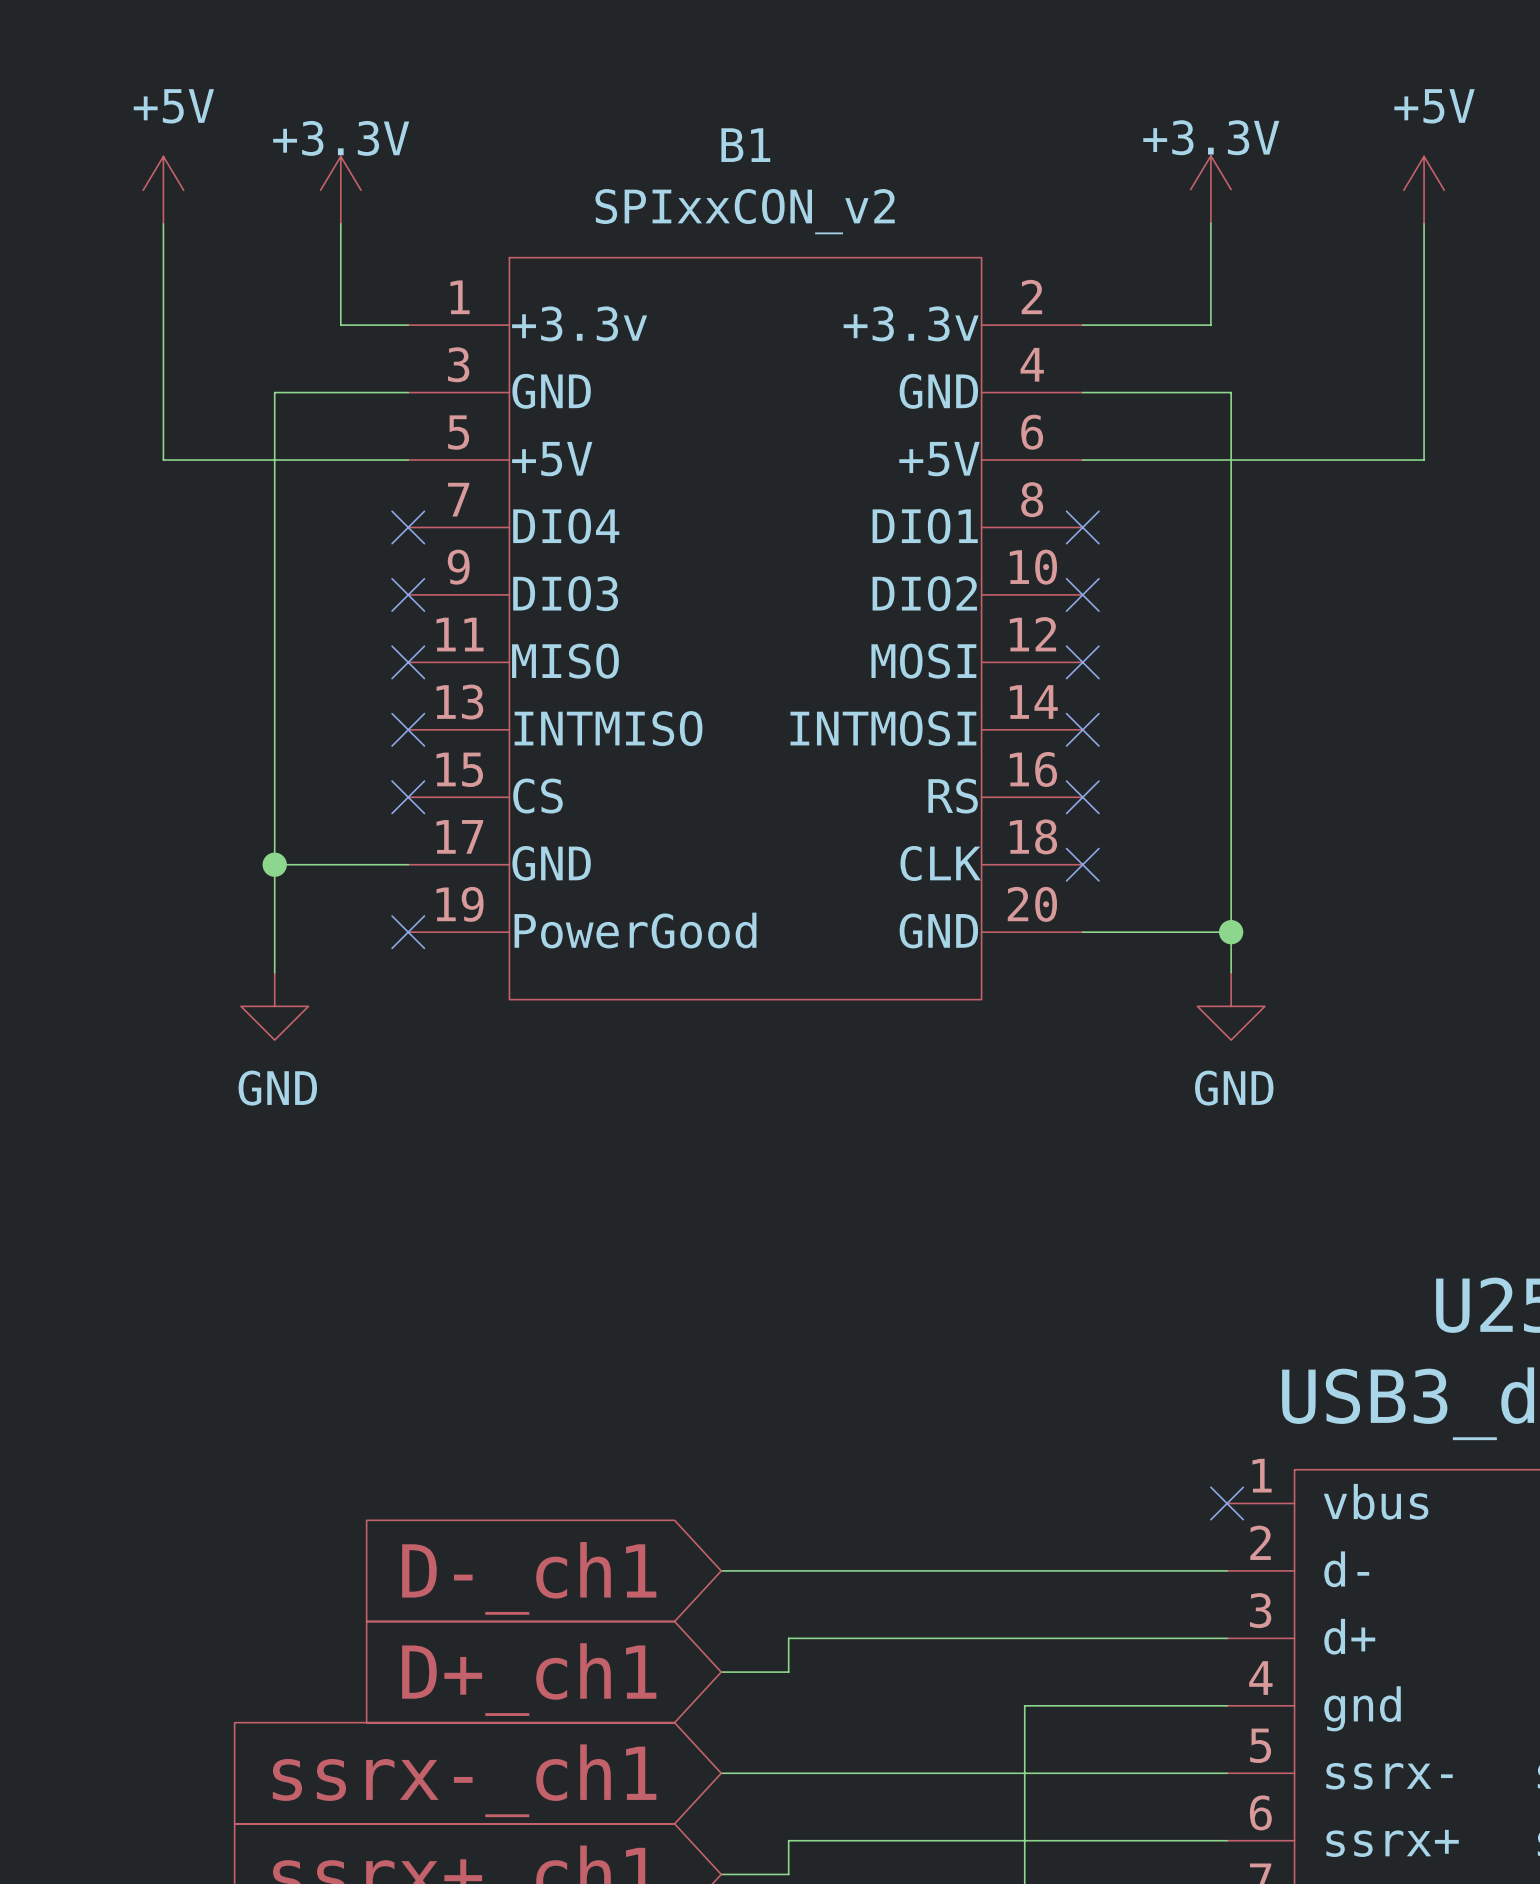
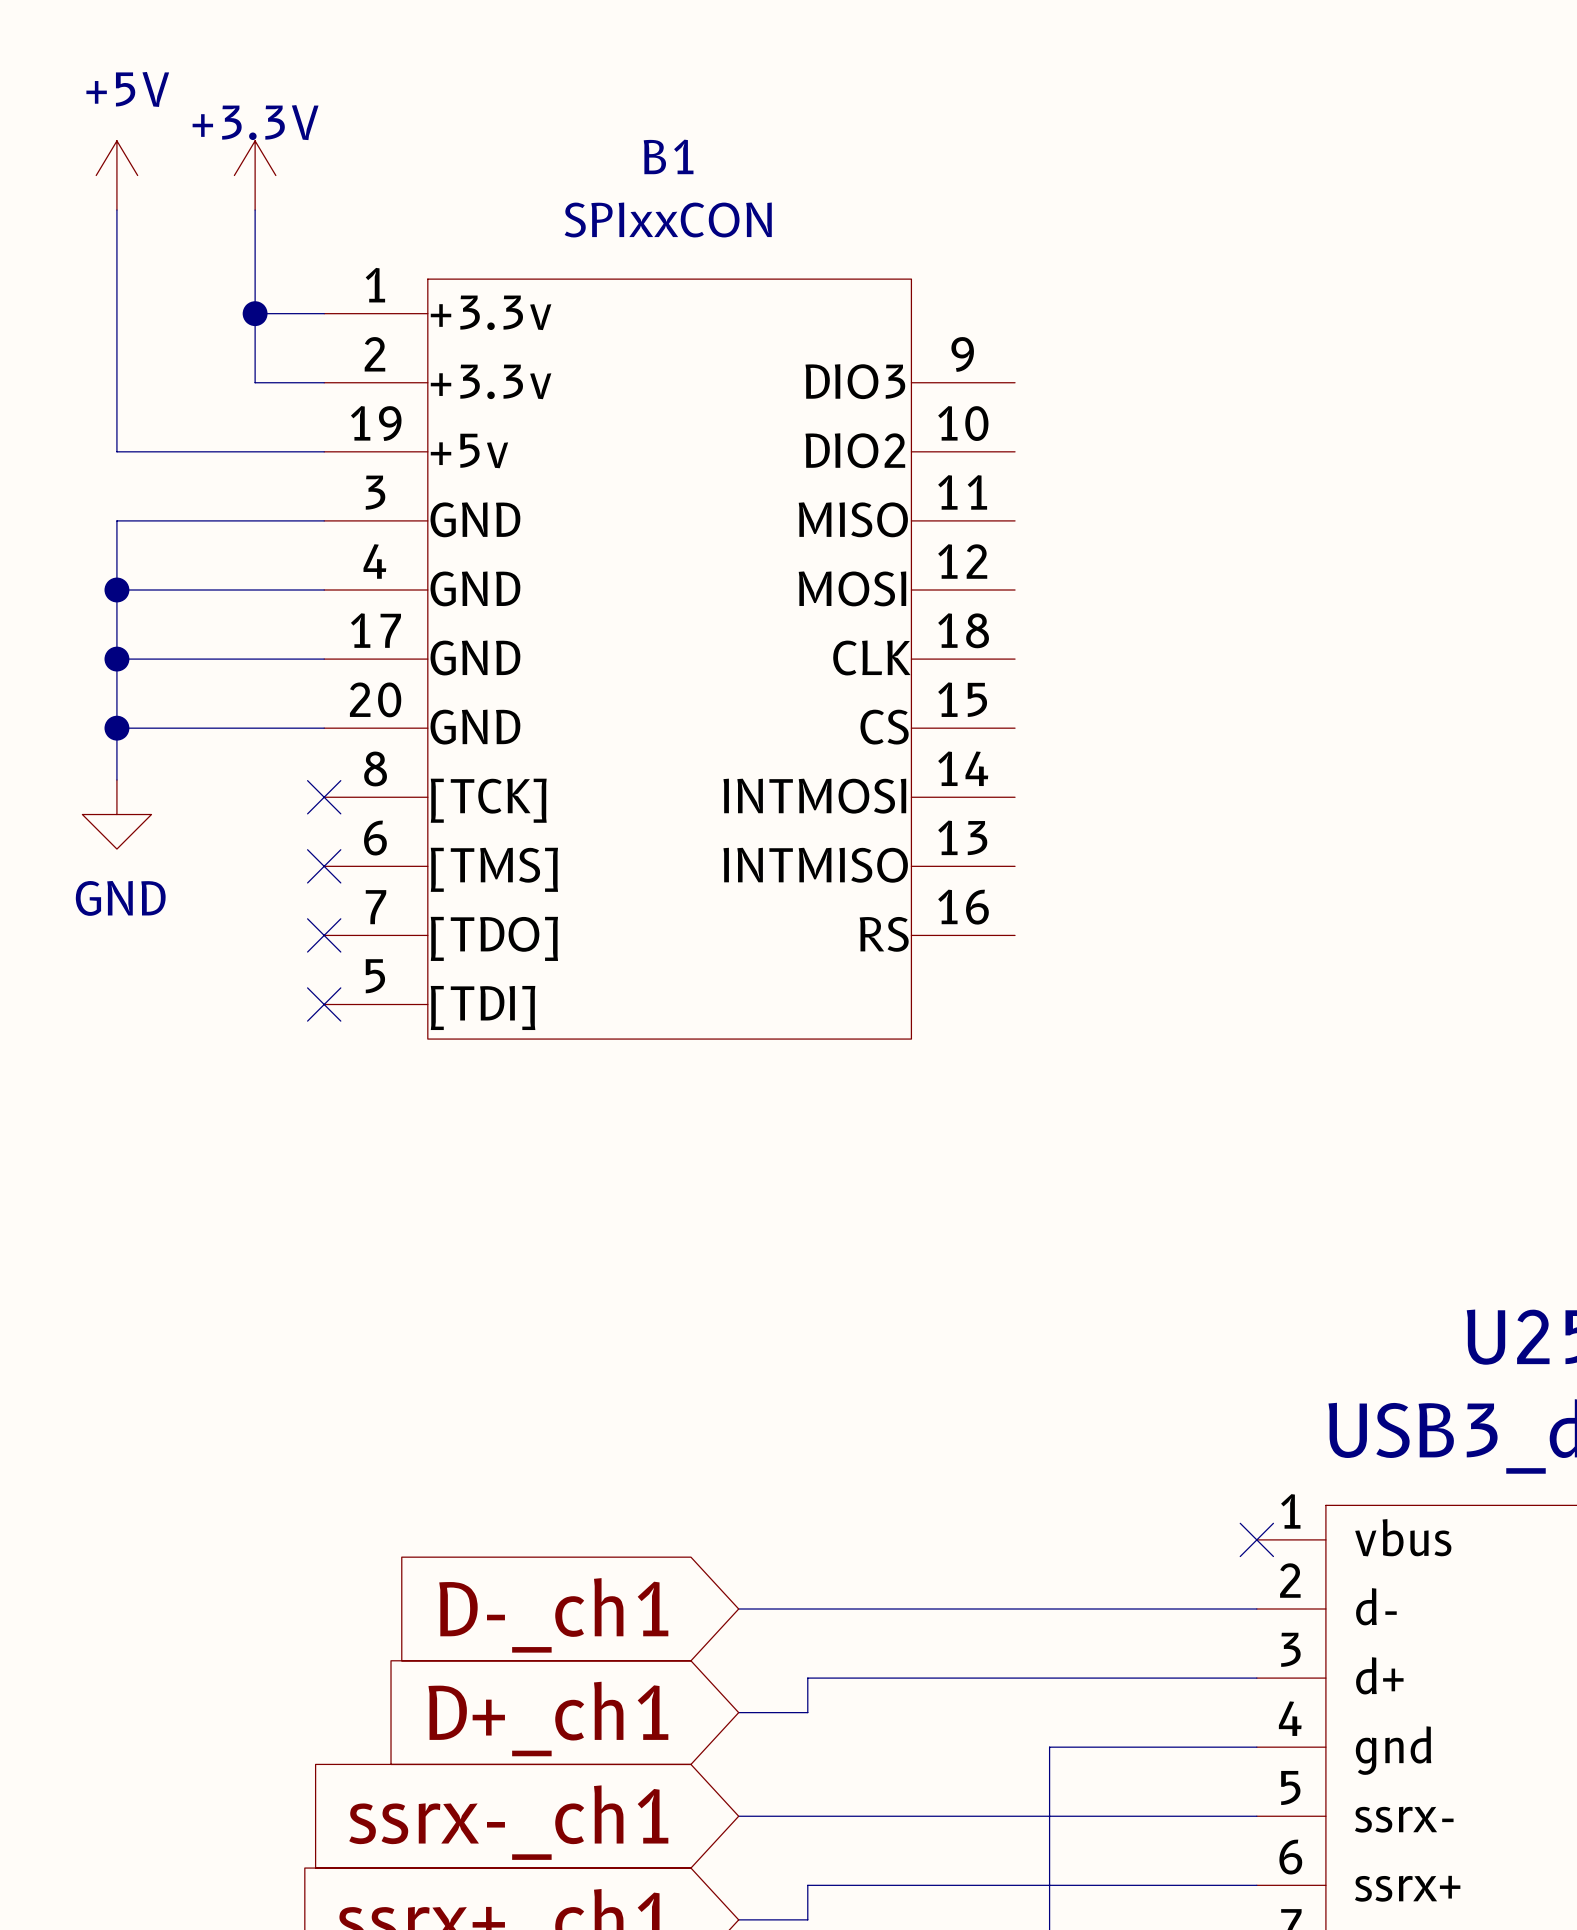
power symbol: +3.3V (1210, 189) -> none
power symbol position: +5V (163, 190) -> +5V (116, 175)
power symbol position: +3.3V (340, 190) -> +3.3V (255, 175)
power symbol: +5V (1424, 190) -> none
wire: none -> (116, 210) (116, 451) (324, 451)
wire: none -> (255, 210) (255, 382) (324, 382)
B1 value: SPIxxCON_v2 (745, 211) -> SPIxxCON (668, 219)
wire: (163, 223) (163, 460) (408, 460) -> none
wire: (340, 223) (340, 325) (408, 325) -> none
wire: (1210, 223) (1210, 325) (1082, 325) -> none
wire: (1424, 223) (1424, 460) (1082, 460) -> none
B1 symbol: [408, 257, 1083, 1000] -> [324, 279, 1016, 1040]
wire: none -> (255, 313) (324, 313)
junction: none -> (255, 313)
wire: (408, 392) (274, 392) (274, 972) -> none
wire: (1082, 392) (1231, 392) (1231, 972) -> none
wire: none -> (324, 520) (116, 520) (116, 779)
no-connect mark: (408, 527) -> none
no-connect mark: (1082, 527) -> none
wire: none -> (116, 590) (324, 590)
junction: none -> (116, 590)
no-connect mark: (408, 594) -> none
no-connect mark: (1082, 594) -> none
wire: none -> (116, 659) (324, 659)
junction: none -> (116, 659)
no-connect mark: (408, 662) -> none
no-connect mark: (1082, 662) -> none
wire: none -> (116, 728) (324, 728)
junction: none -> (116, 728)
no-connect mark: (408, 729) -> none
no-connect mark: (1082, 729) -> none
no-connect mark: none -> (324, 797)
no-connect mark: (408, 797) -> none
no-connect mark: (1082, 797) -> none
no-connect mark: none -> (324, 866)
wire: (274, 864) (408, 864) -> none
junction: (274, 864) -> none
no-connect mark: (1082, 864) -> none
no-connect mark: none -> (324, 935)
no-connect mark: (408, 932) -> none
wire: (1082, 932) (1231, 932) -> none
junction: (1231, 932) -> none
no-connect mark: none -> (324, 1004)
power symbol position: GND (274, 1006) -> GND (116, 814)
power symbol: GND (1231, 1006) -> none

